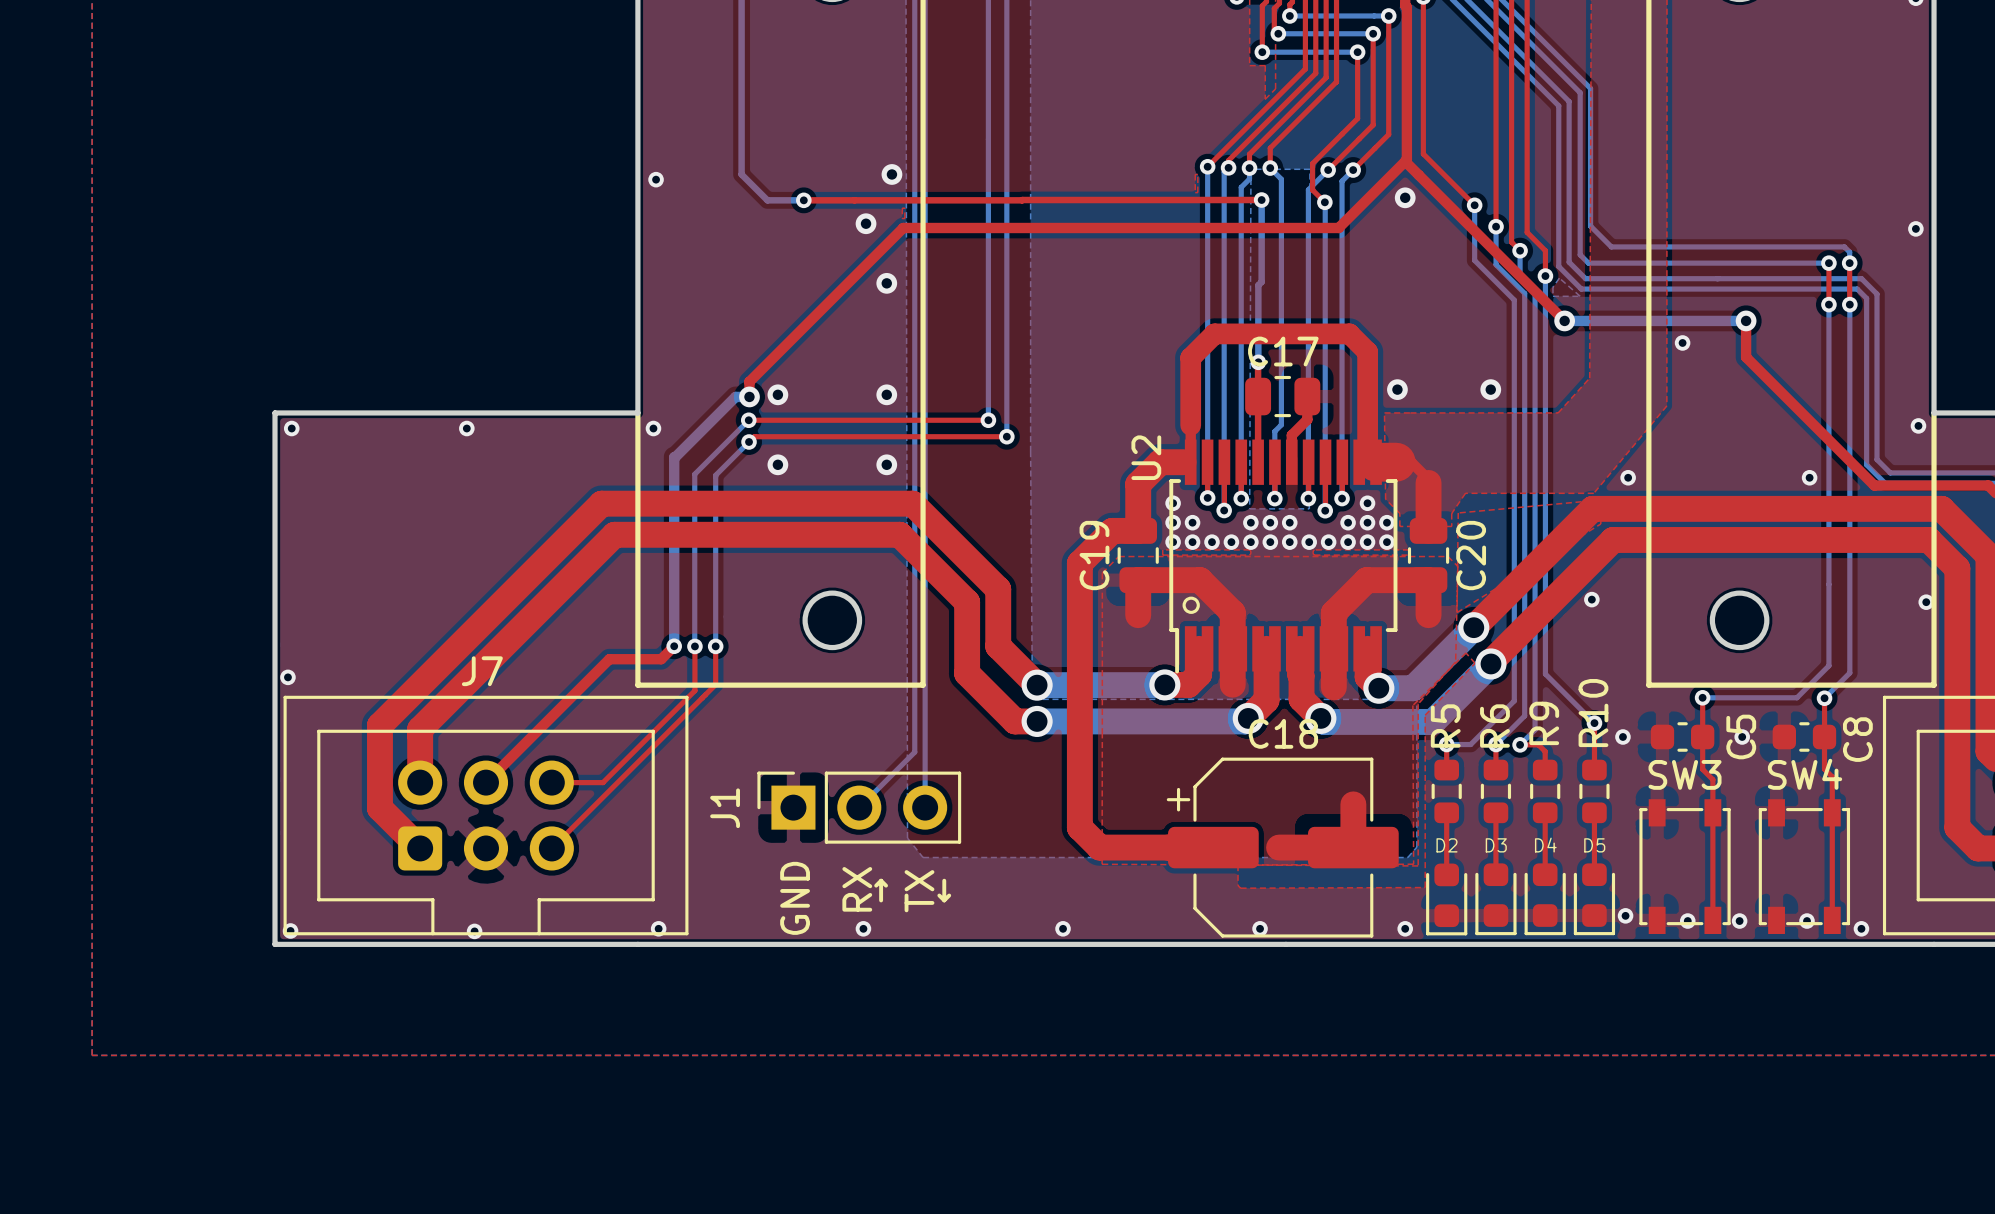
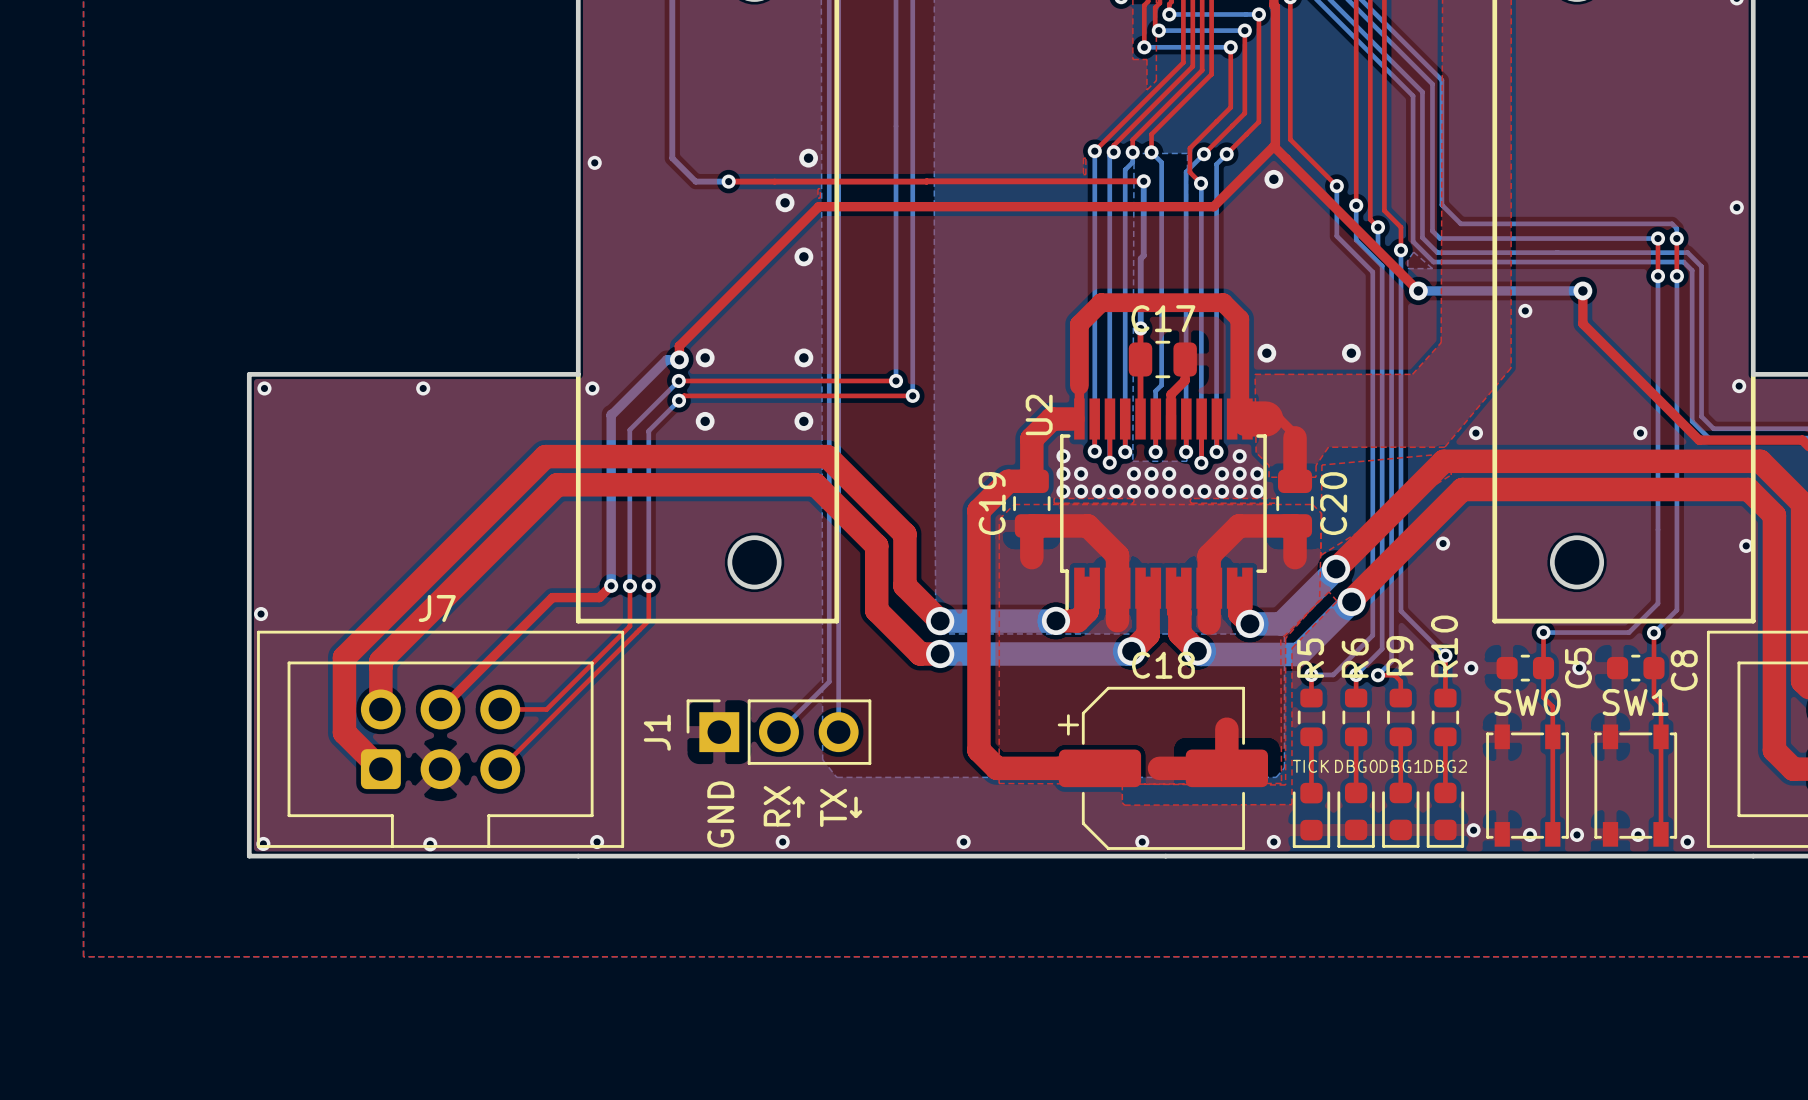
drawing: [1182, 596, 1200, 614] -> none
SW3 name: SW3 (1685, 774) -> SW0 (1527, 702)
SW4 name: SW4 (1805, 774) -> SW1 (1635, 702)
D2 name: D2 (1447, 845) -> TICK (1310, 766)
D3 name: D3 (1496, 845) -> DBG0 (1356, 766)
D4 name: D4 (1545, 845) -> DBG1 (1401, 766)
D5 name: D5 (1594, 845) -> DBG2 (1445, 766)

